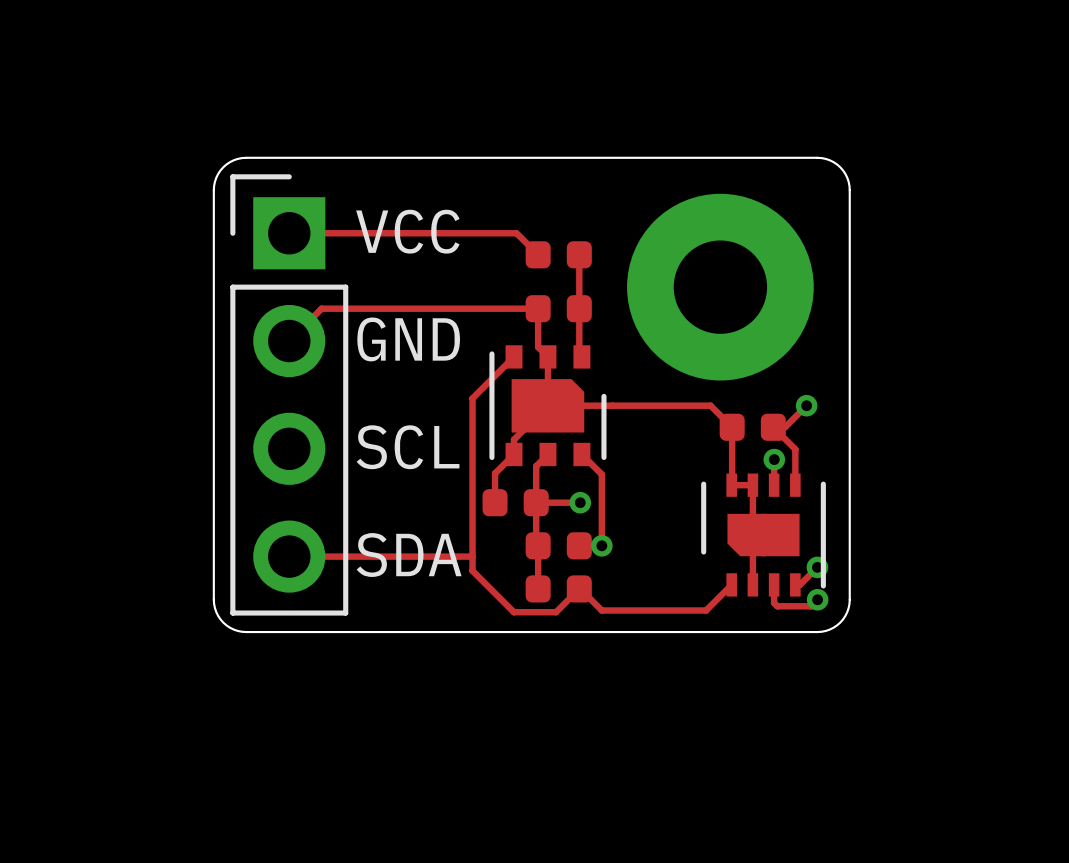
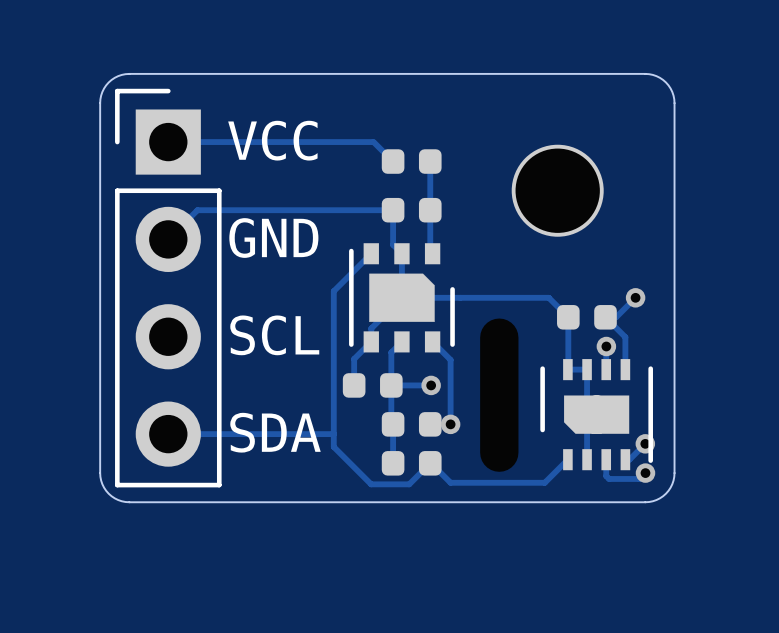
part footprint: [627, 193, 814, 381] -> [511, 144, 604, 237]

